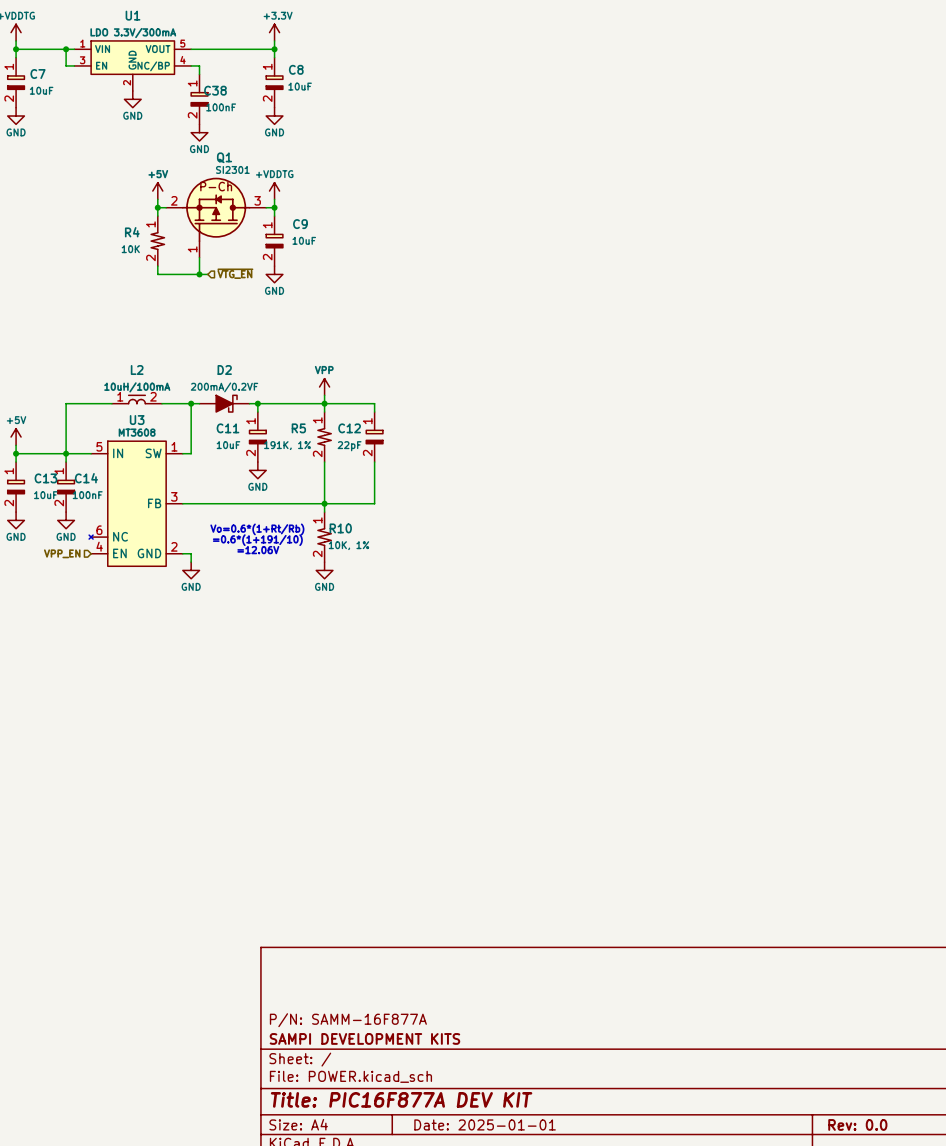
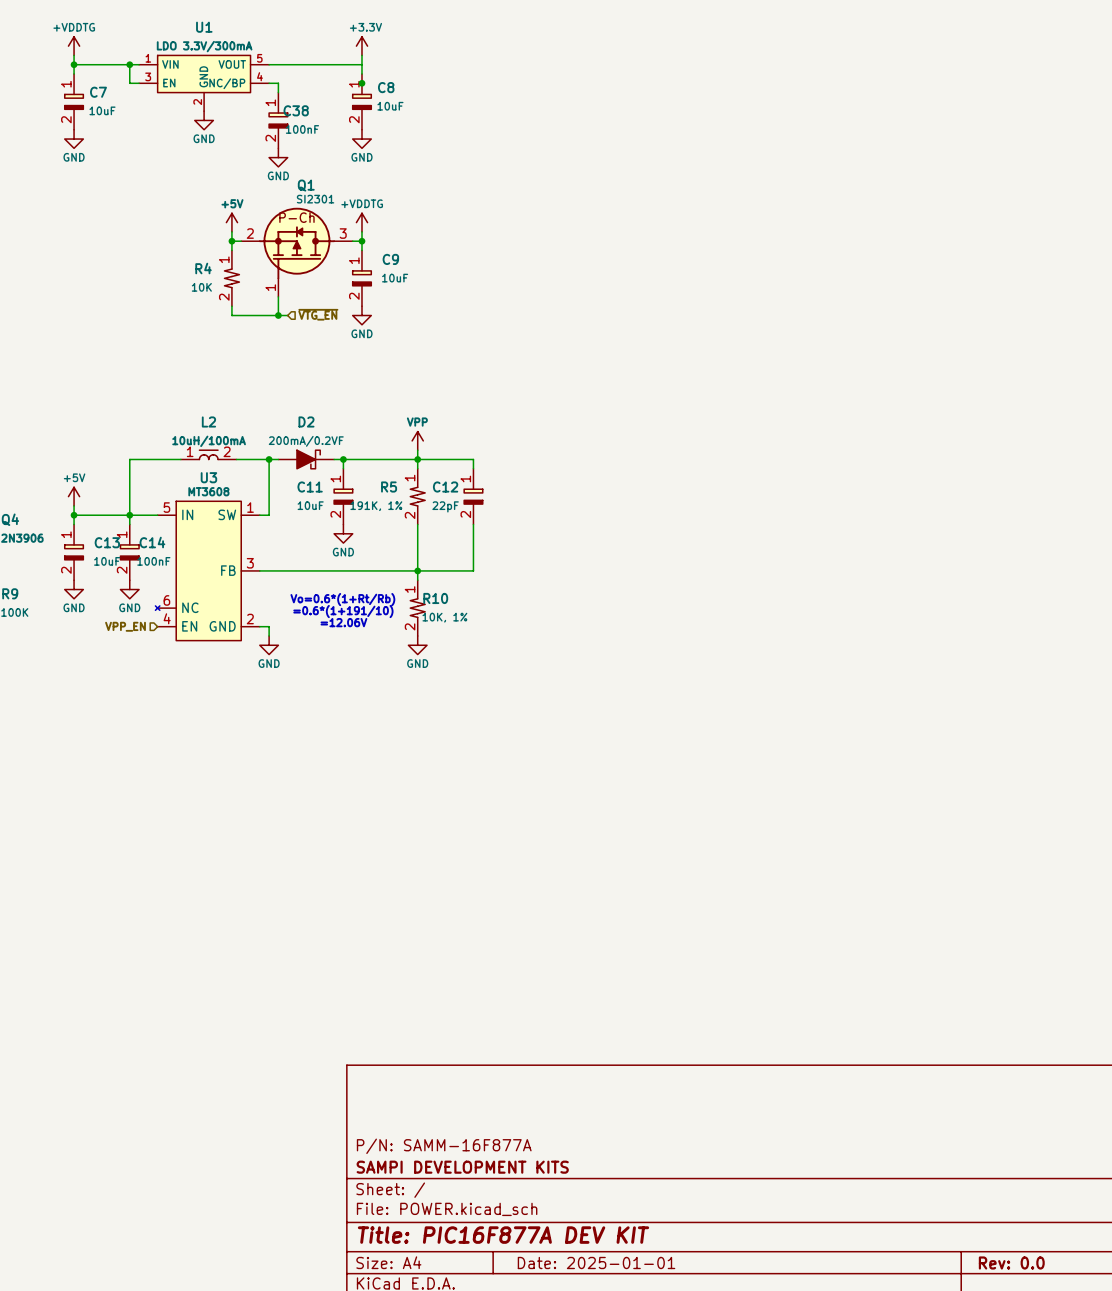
junction position: (274, 49) -> (361, 83)

